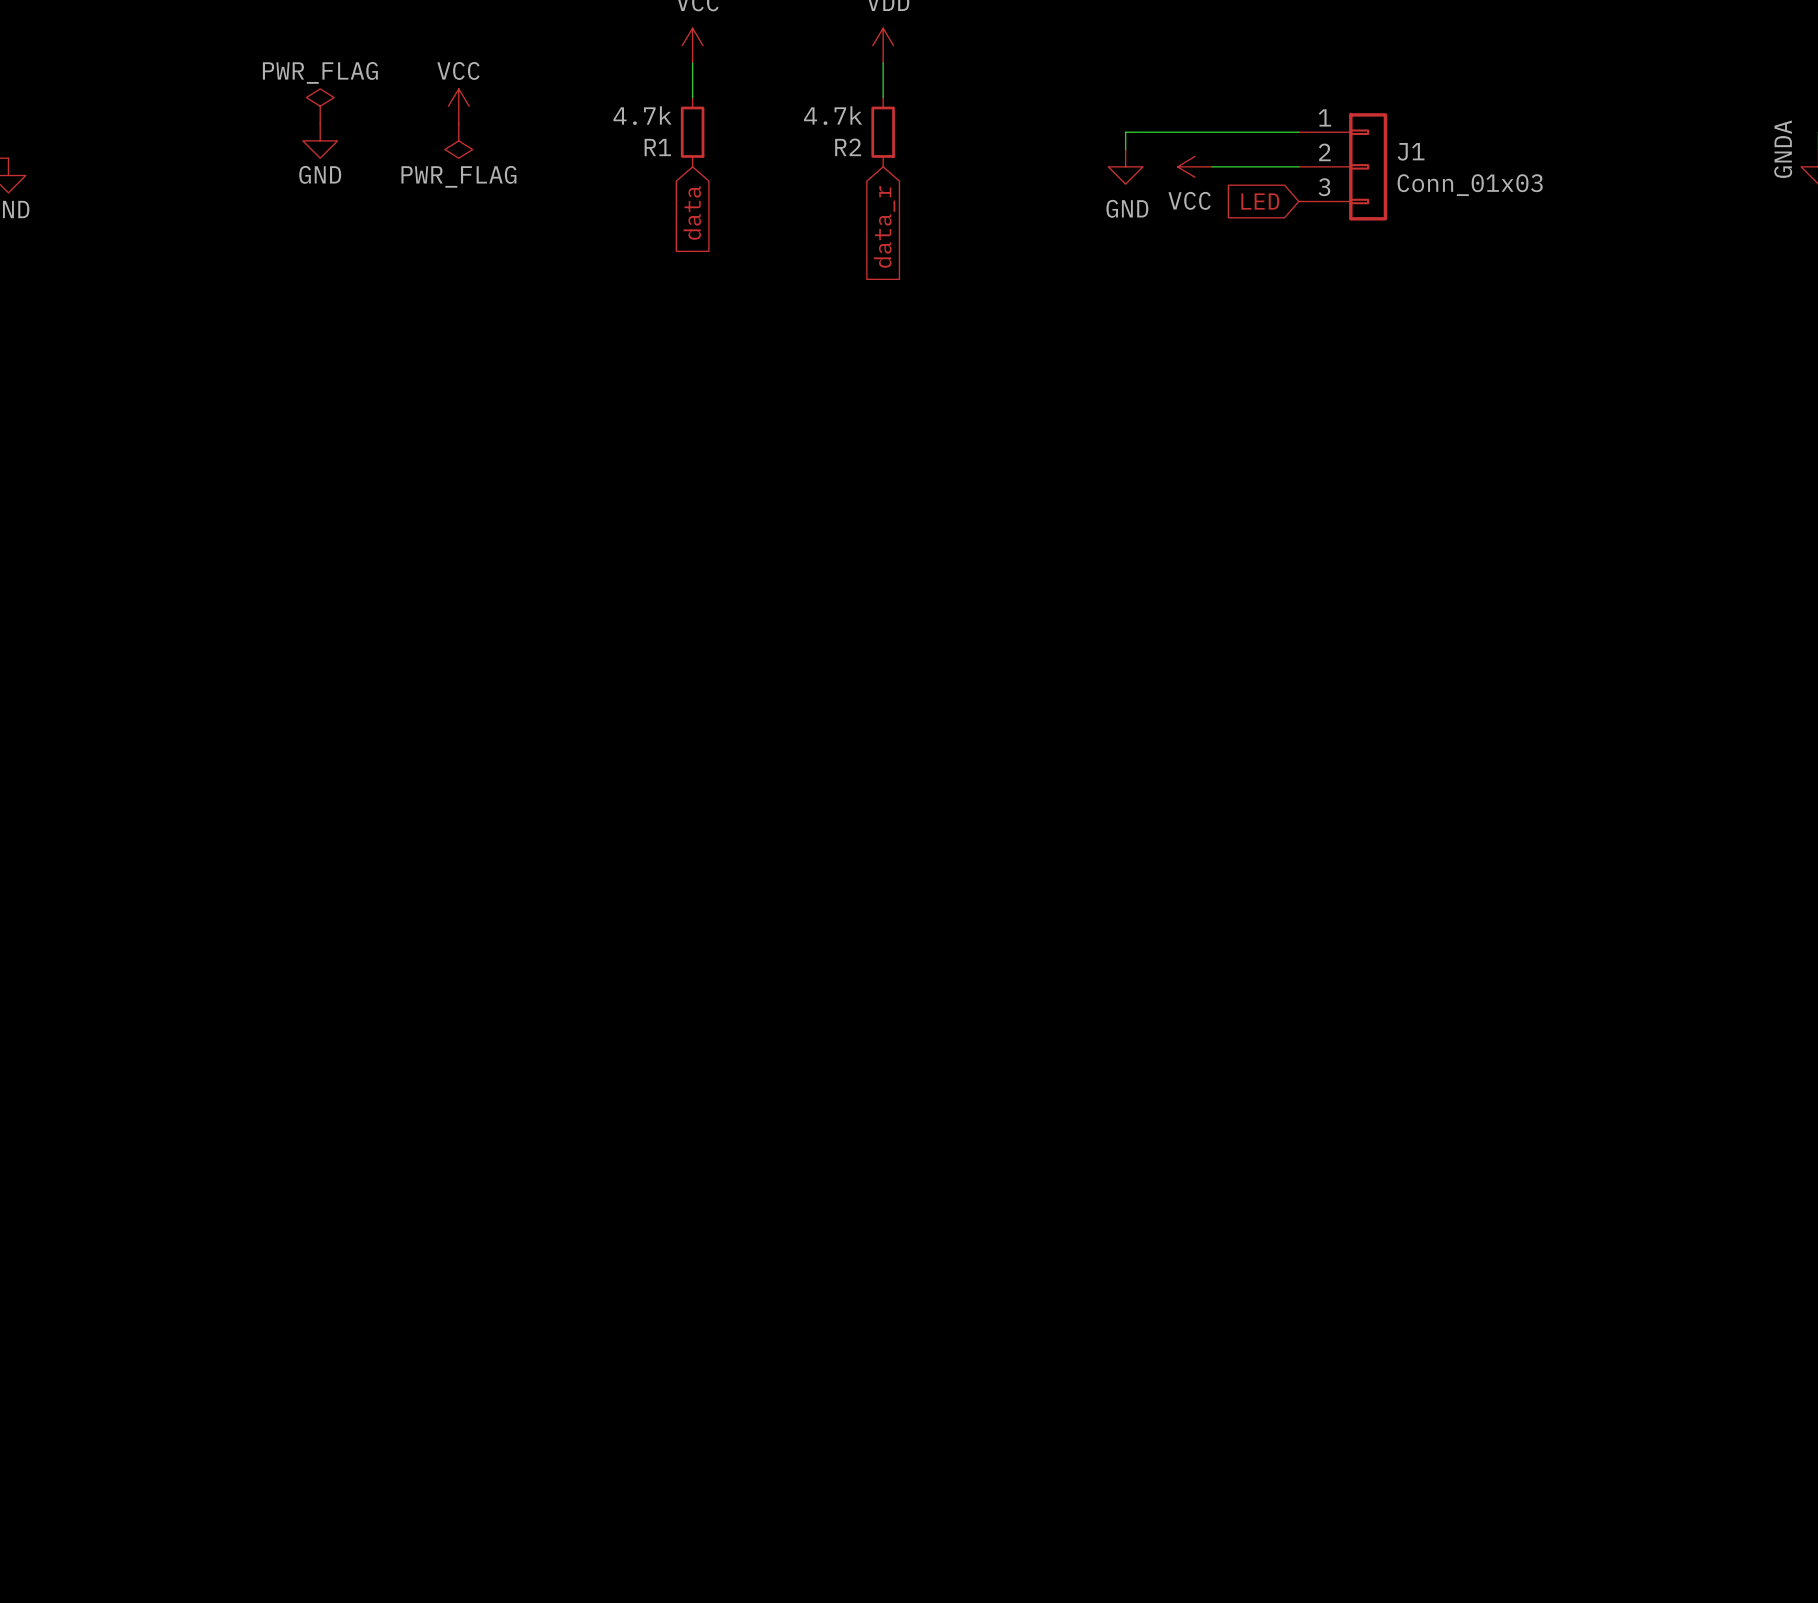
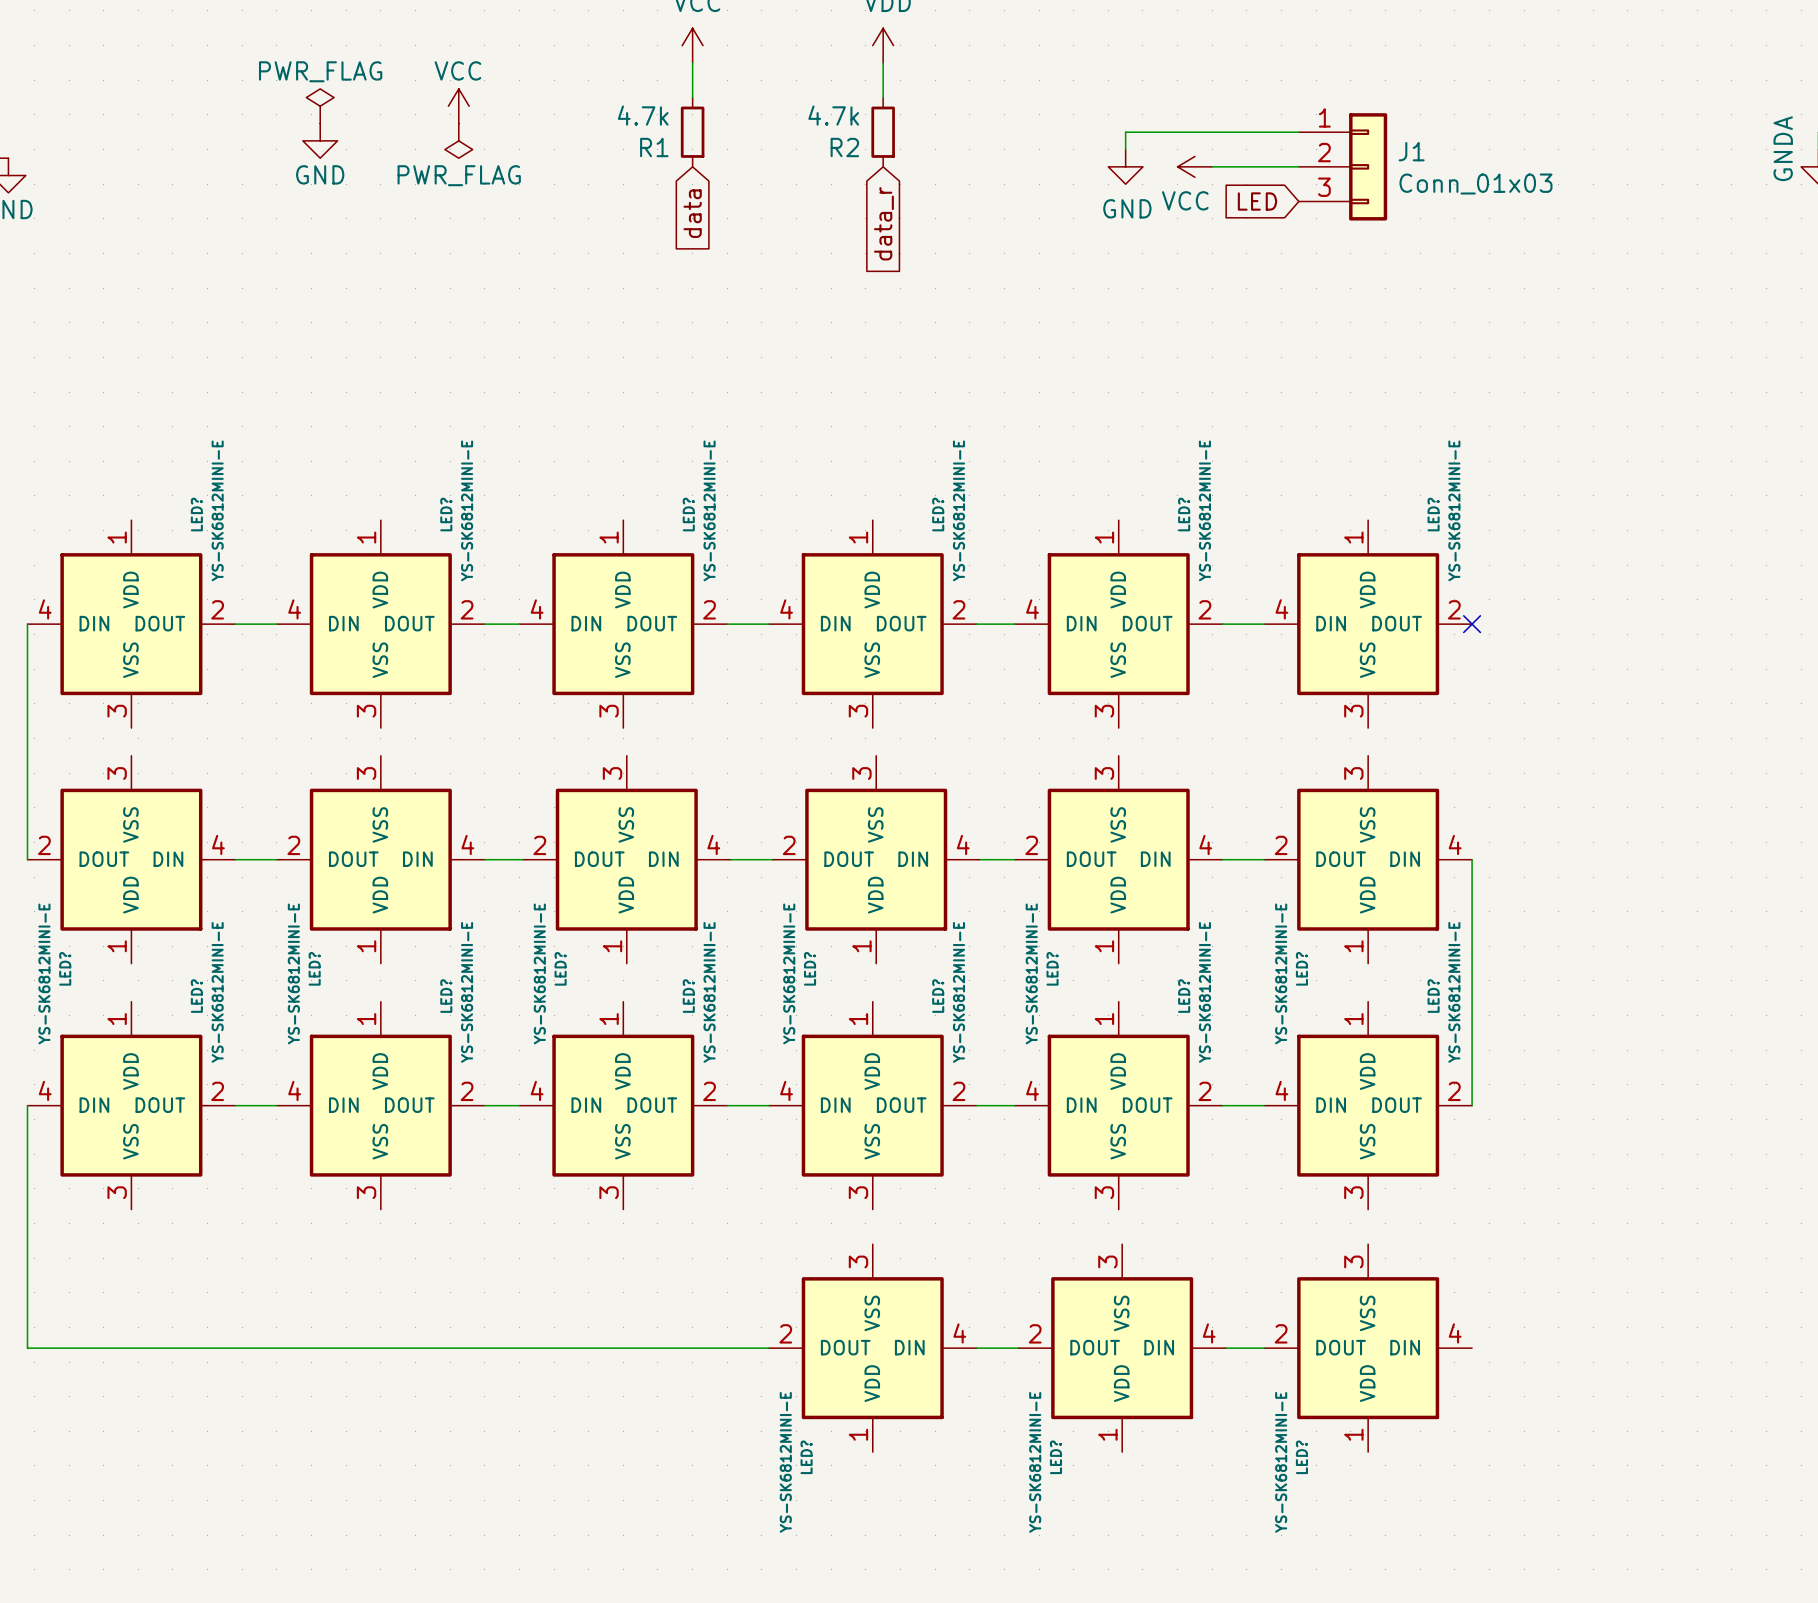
wire: none -> (27, 624) (27, 859)
LED?: none -> YS-SK6812MINI-E (131, 624)
wire: none -> (235, 624) (276, 624)
LED?: none -> YS-SK6812MINI-E (380, 624)
wire: none -> (484, 624) (519, 624)
LED?: none -> YS-SK6812MINI-E (623, 624)
wire: none -> (727, 624) (768, 624)
LED?: none -> YS-SK6812MINI-E (872, 624)
wire: none -> (976, 624) (1014, 624)
LED?: none -> YS-SK6812MINI-E (1118, 624)
wire: none -> (1222, 624) (1264, 624)
LED?: none -> YS-SK6812MINI-E (1368, 624)
no-connect mark: none -> (1472, 624)
LED?: none -> YS-SK6812MINI-E (131, 859)
wire: none -> (235, 859) (276, 859)
LED?: none -> YS-SK6812MINI-E (380, 859)
wire: none -> (484, 859) (522, 859)
LED?: none -> YS-SK6812MINI-E (626, 859)
wire: none -> (730, 859) (772, 859)
LED?: none -> YS-SK6812MINI-E (876, 859)
wire: none -> (980, 859) (1014, 859)
LED?: none -> YS-SK6812MINI-E (1118, 859)
wire: none -> (1222, 859) (1264, 859)
LED?: none -> YS-SK6812MINI-E (1368, 859)
wire: none -> (1472, 859) (1472, 1105)
wire: none -> (27, 1105) (27, 1348) (768, 1348)
LED?: none -> YS-SK6812MINI-E (131, 1105)
wire: none -> (235, 1105) (276, 1105)
LED?: none -> YS-SK6812MINI-E (380, 1105)
wire: none -> (484, 1105) (519, 1105)
LED?: none -> YS-SK6812MINI-E (623, 1105)
wire: none -> (727, 1105) (768, 1105)
LED?: none -> YS-SK6812MINI-E (872, 1105)
wire: none -> (976, 1105) (1014, 1105)
LED?: none -> YS-SK6812MINI-E (1118, 1105)
wire: none -> (1222, 1105) (1264, 1105)
LED?: none -> YS-SK6812MINI-E (1368, 1105)
LED?: none -> YS-SK6812MINI-E (872, 1348)
wire: none -> (976, 1348) (1018, 1348)
LED?: none -> YS-SK6812MINI-E (1122, 1348)
wire: none -> (1226, 1348) (1264, 1348)
LED?: none -> YS-SK6812MINI-E (1368, 1348)

